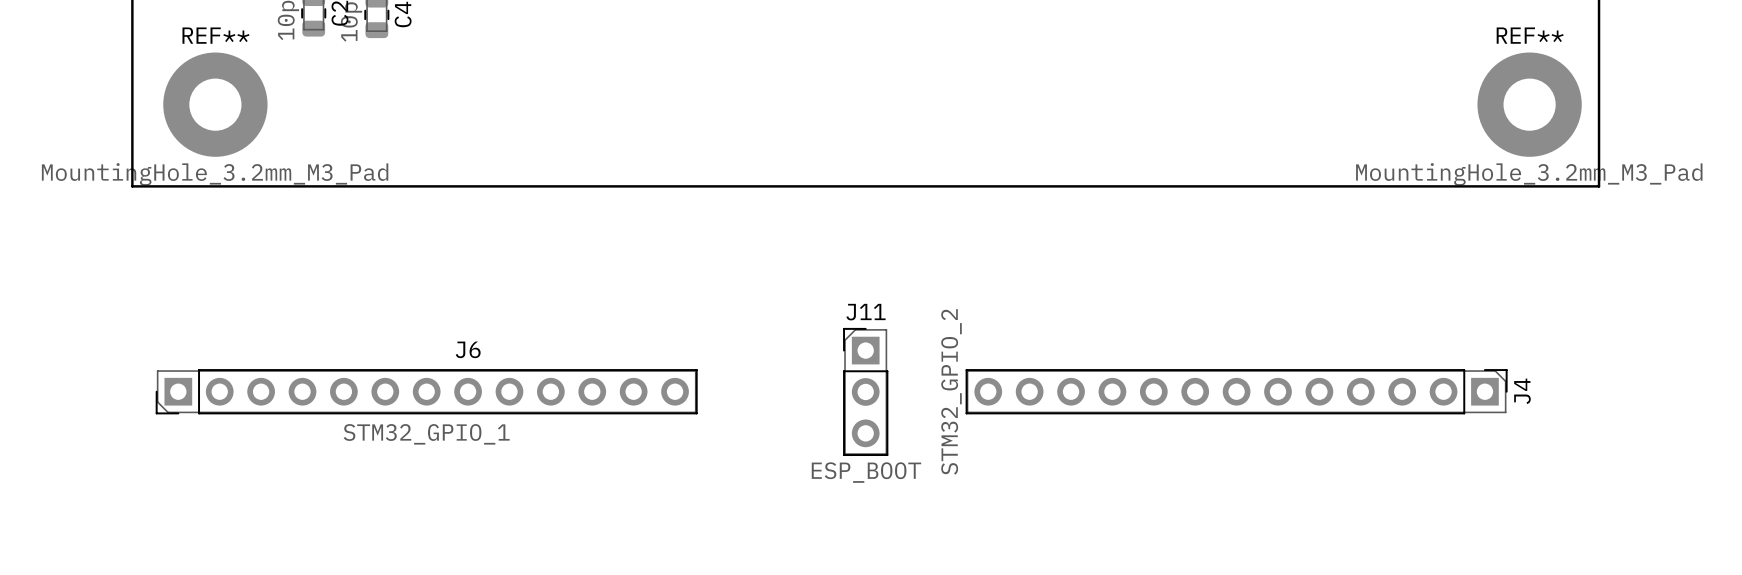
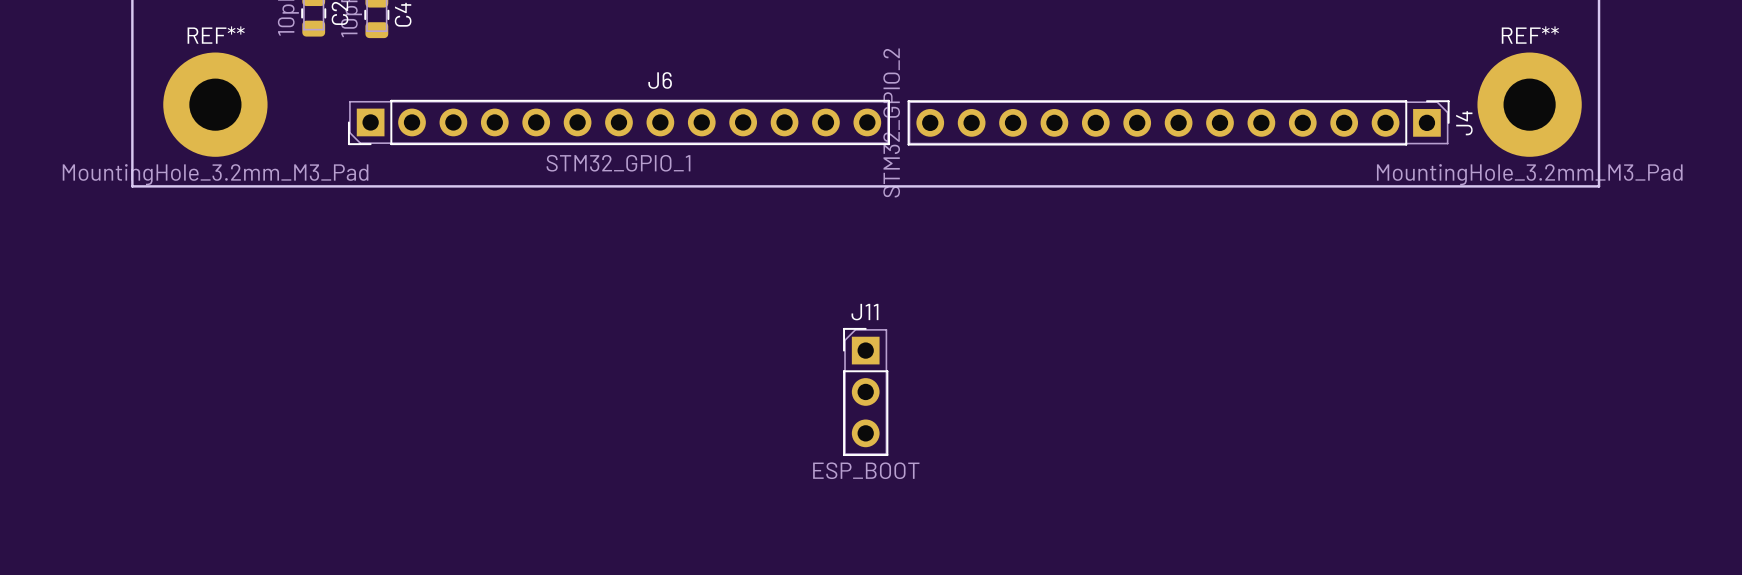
J6 position: (426, 391) -> (618, 122)
J4 position: (1236, 391) -> (1178, 122)

